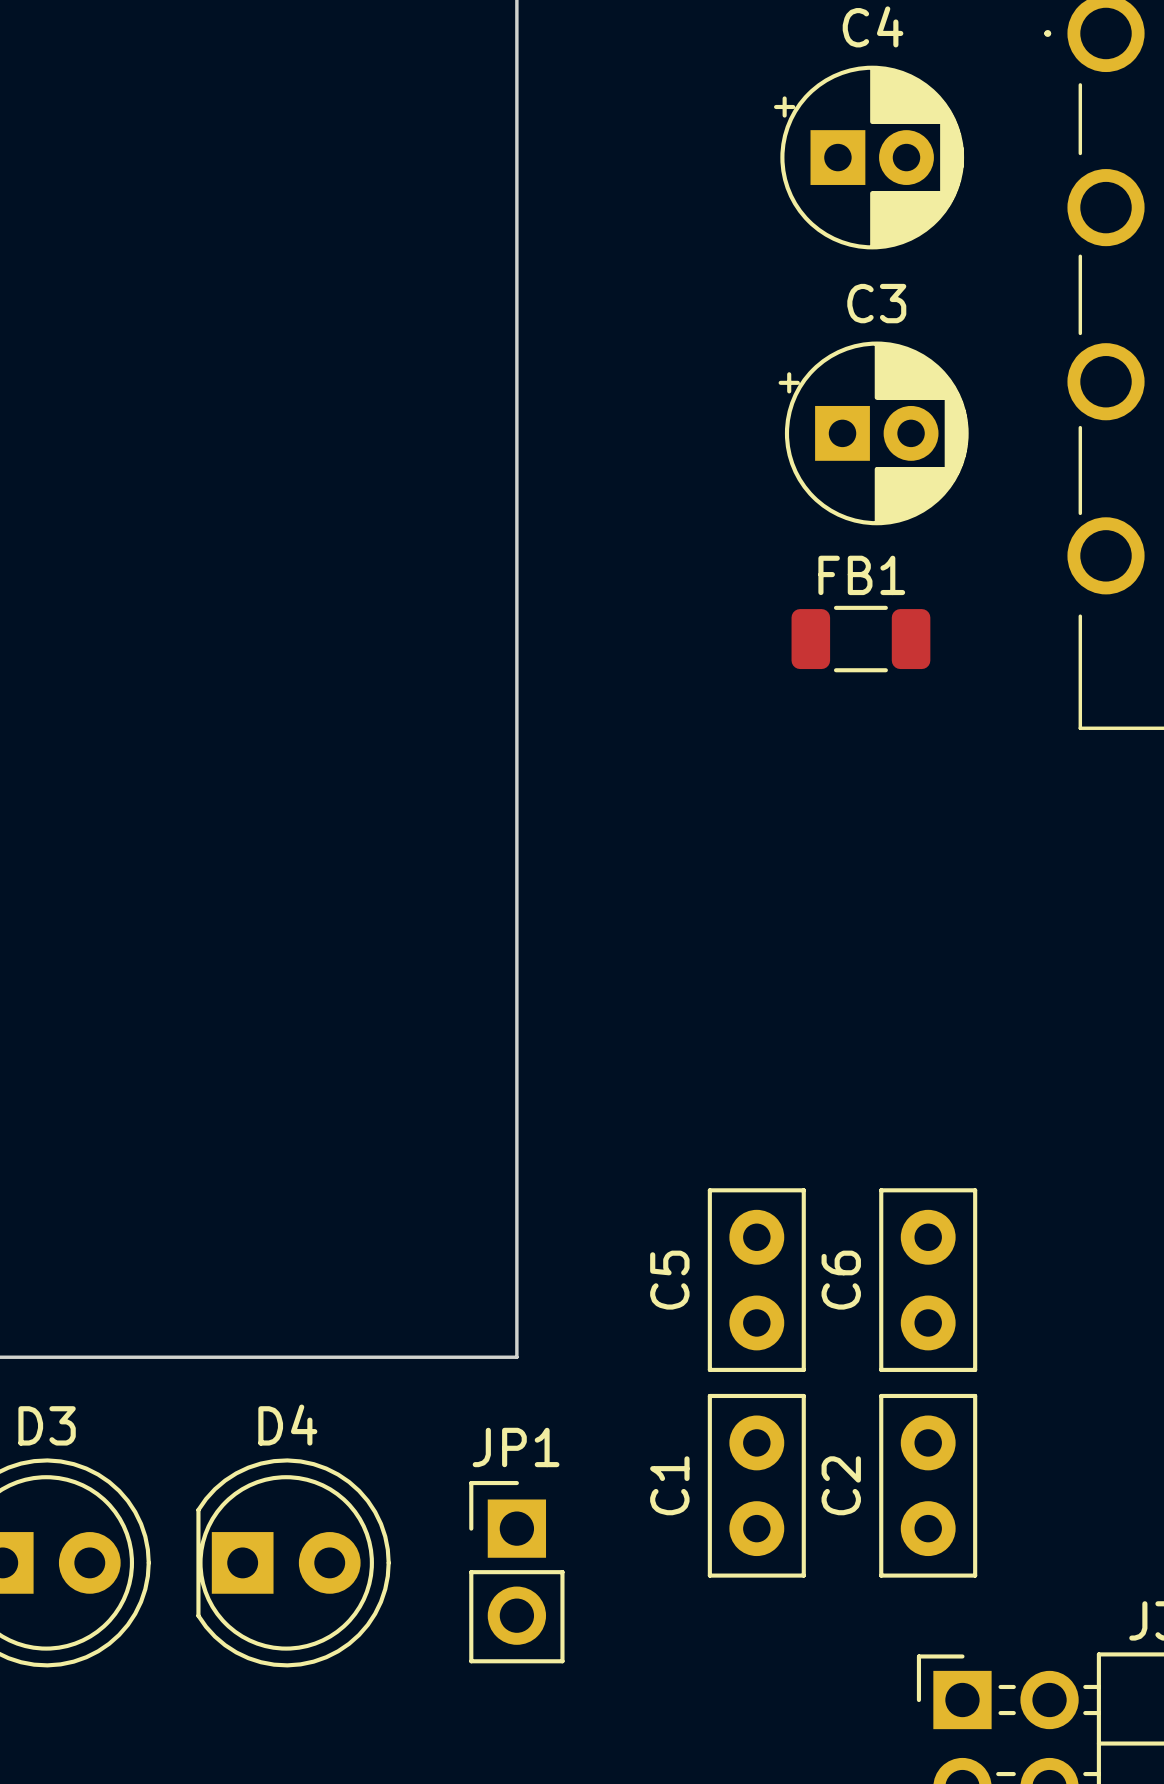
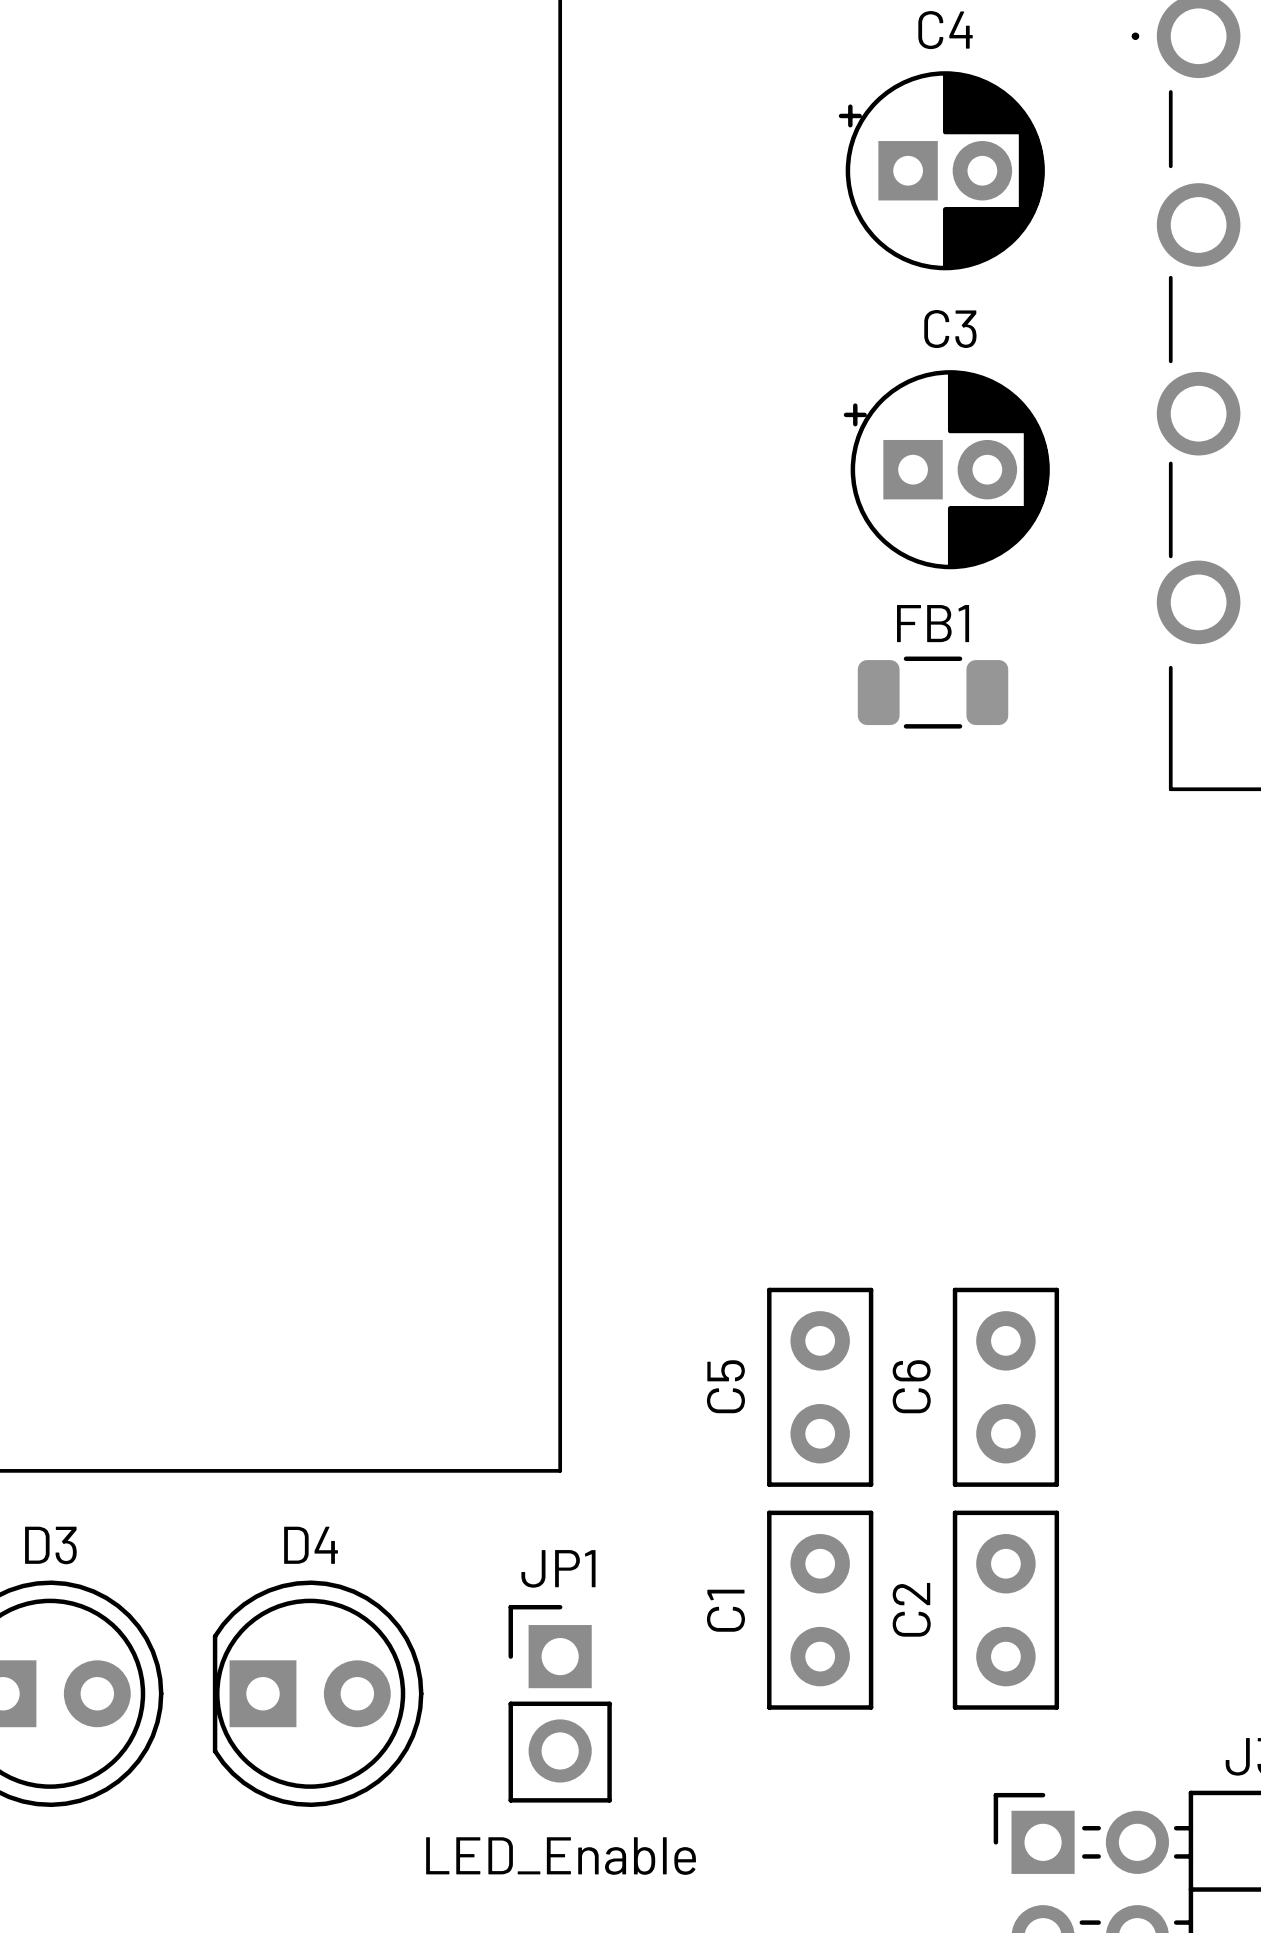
JP1 value: none -> LED_Enable (561, 1856)

